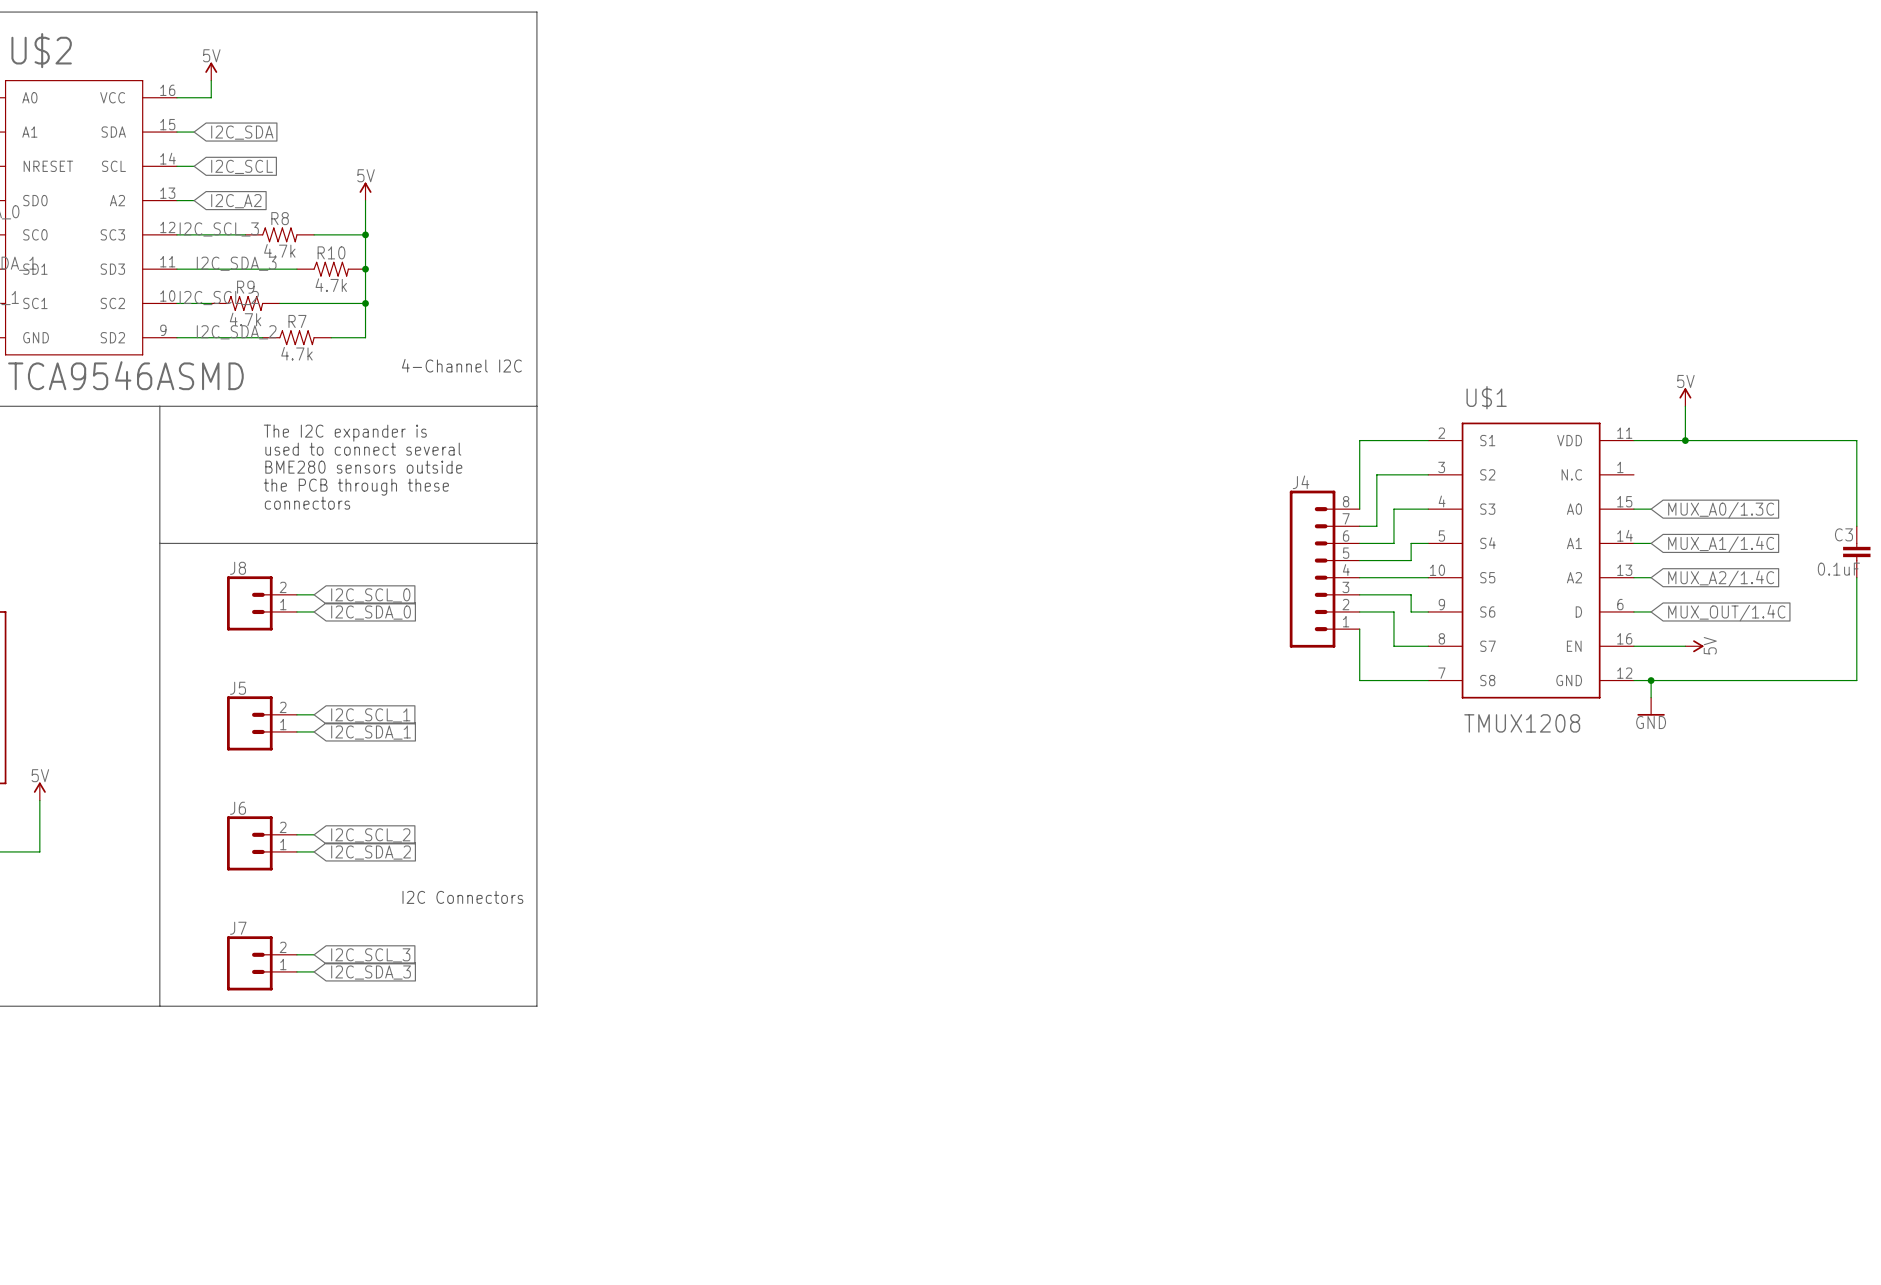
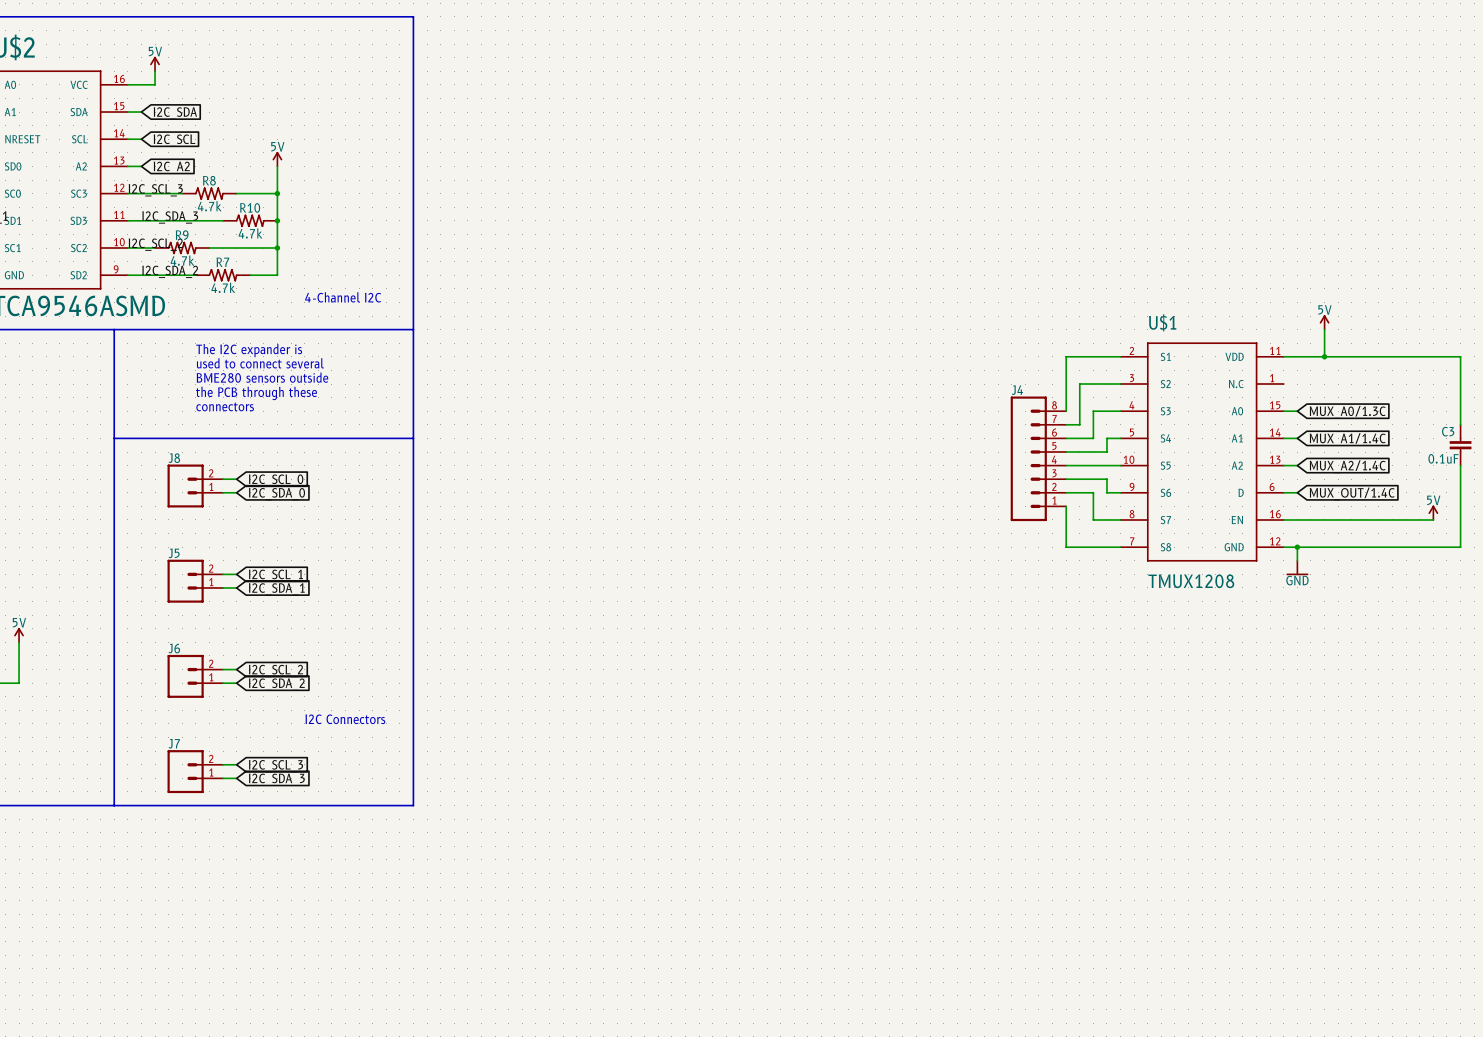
wire: none -> (1324, 519) (1433, 519)
power symbol position: 5V (1694, 646) -> 5V (1433, 512)
power symbol rotation: 0° (1698, 646) -> 90° counterclockwise (1433, 509)

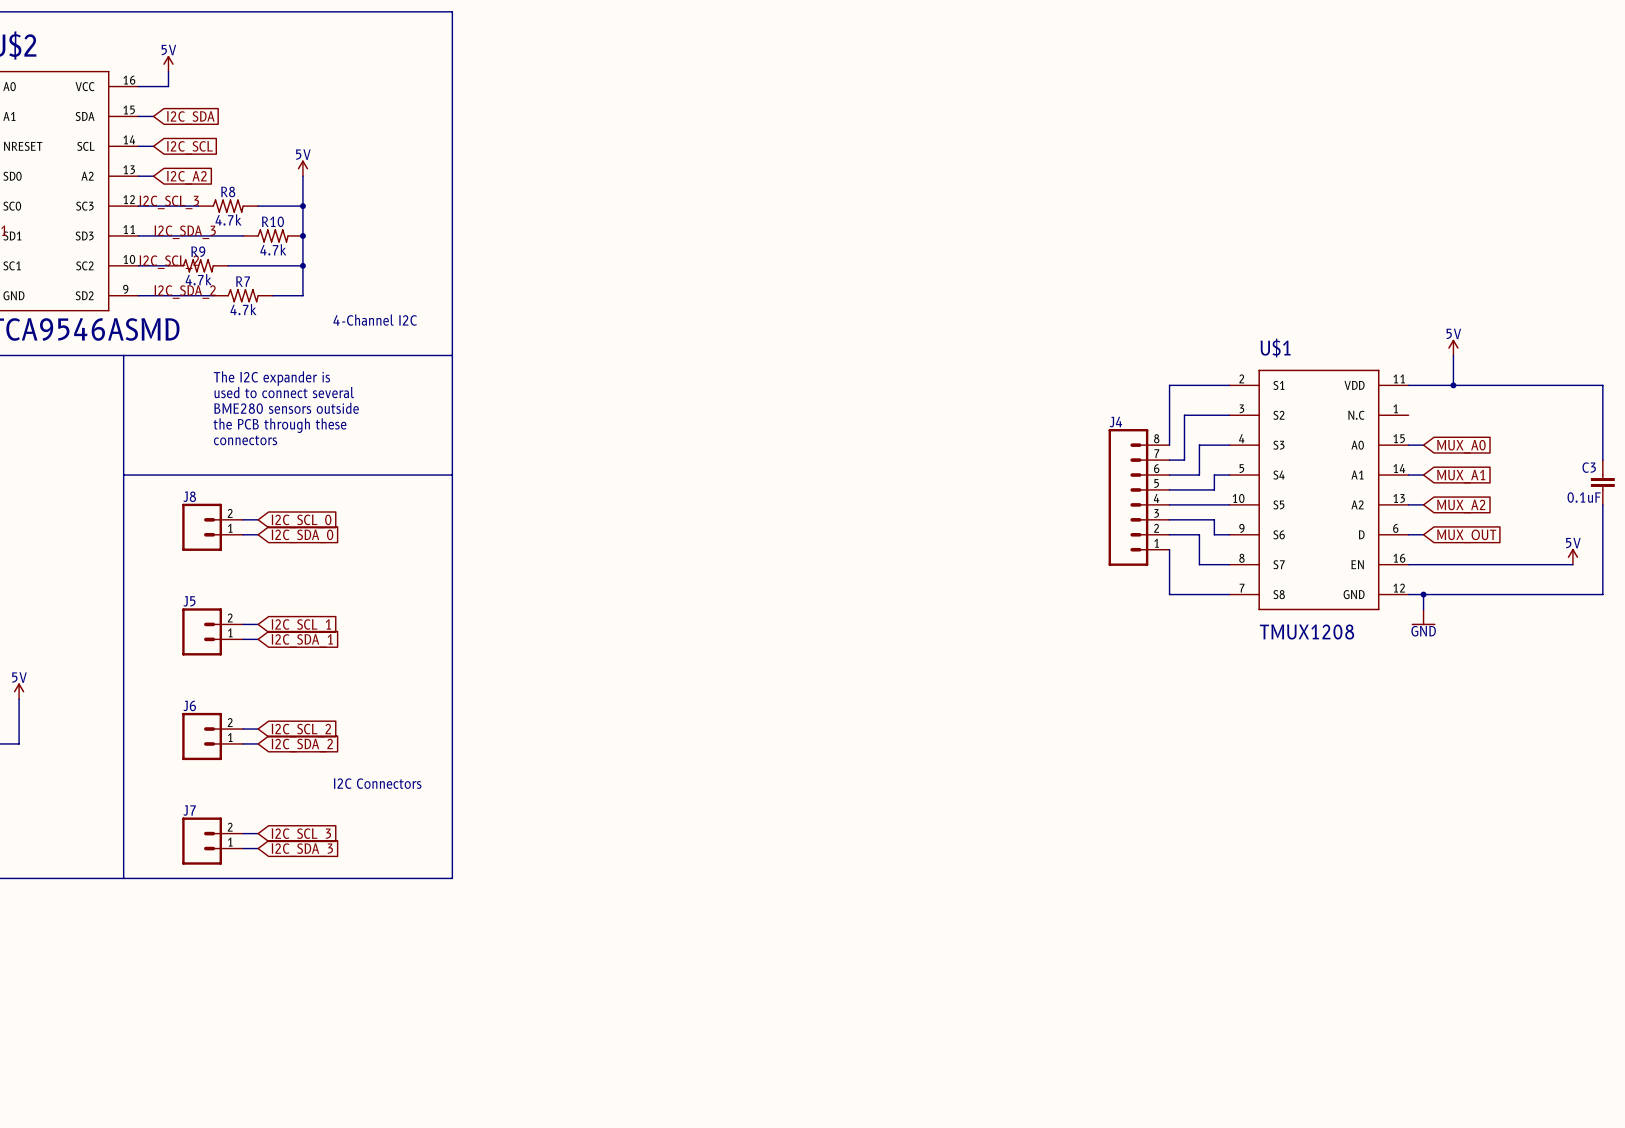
global label: MUX_A0/1.3C (1347, 412) -> MUX_A0 (1461, 446)
global label: MUX_A1/1.4C (1347, 439) -> MUX_A1 (1461, 476)
global label: MUX_A2/1.4C (1347, 466) -> MUX_A2 (1461, 506)
global label: MUX_OUT/1.4C (1352, 493) -> MUX_OUT (1466, 536)

